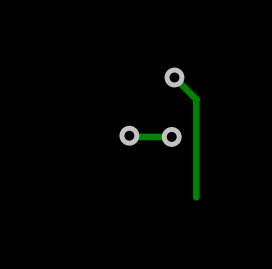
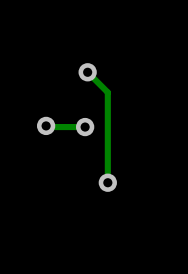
via: none -> (107, 182)

